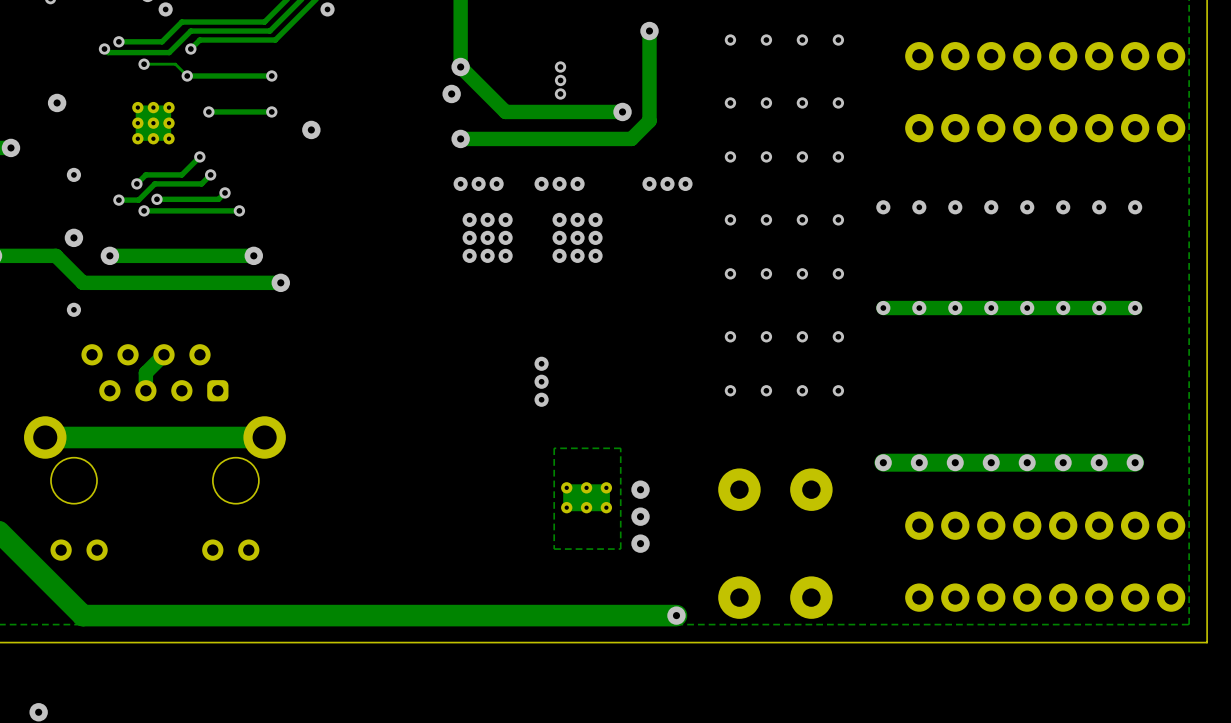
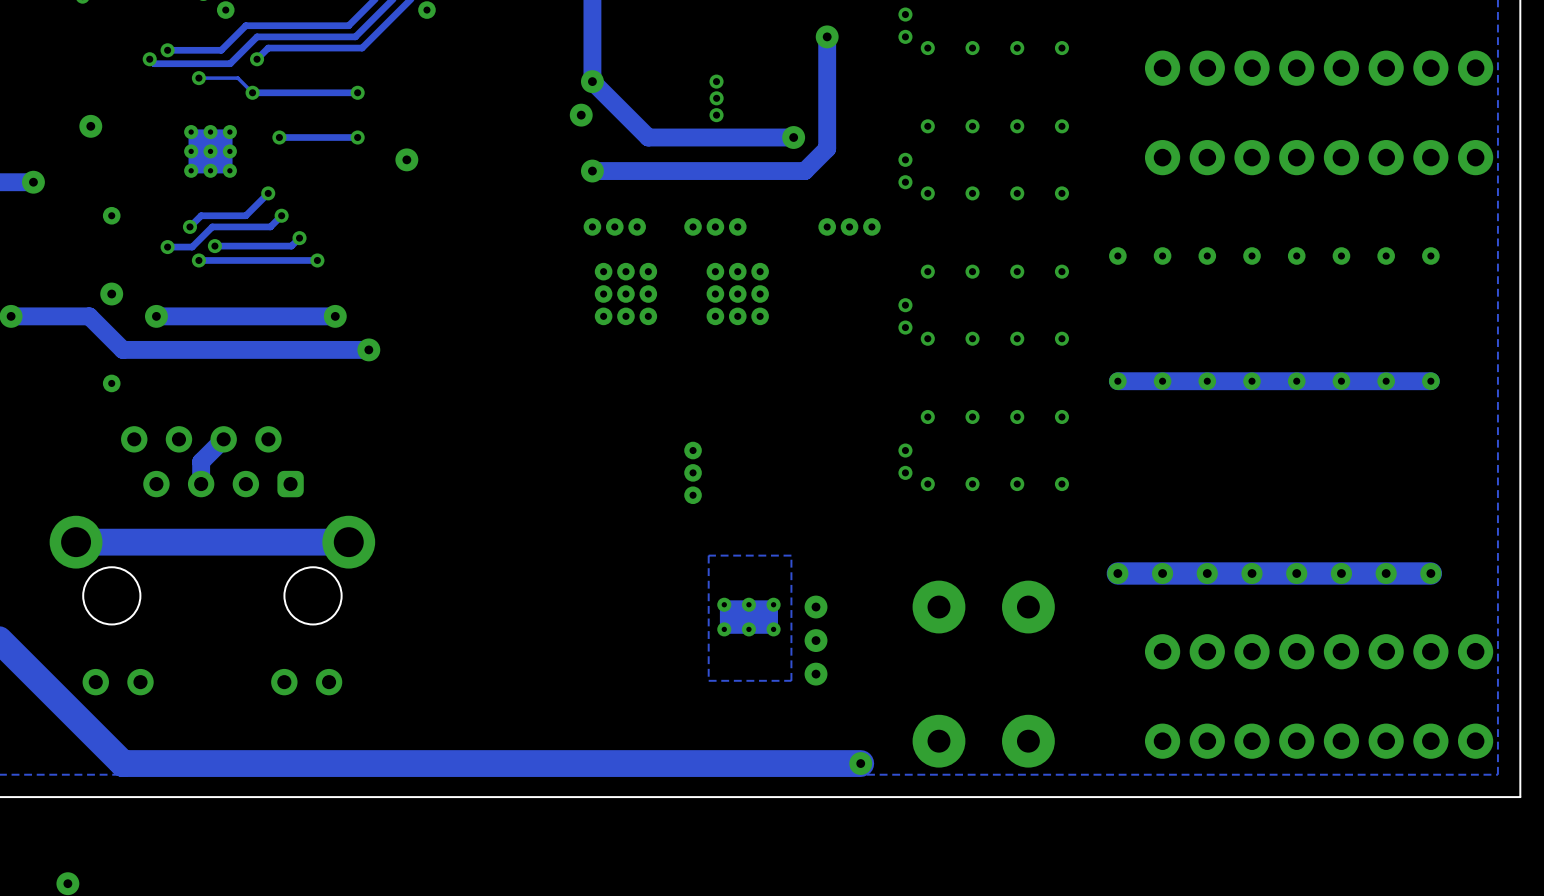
via: none -> (905, 14)
via: none -> (905, 36)
via: none -> (905, 159)
via: none -> (905, 182)
via: none -> (905, 305)
via: none -> (905, 327)
via: none -> (905, 450)
via: none -> (905, 472)

